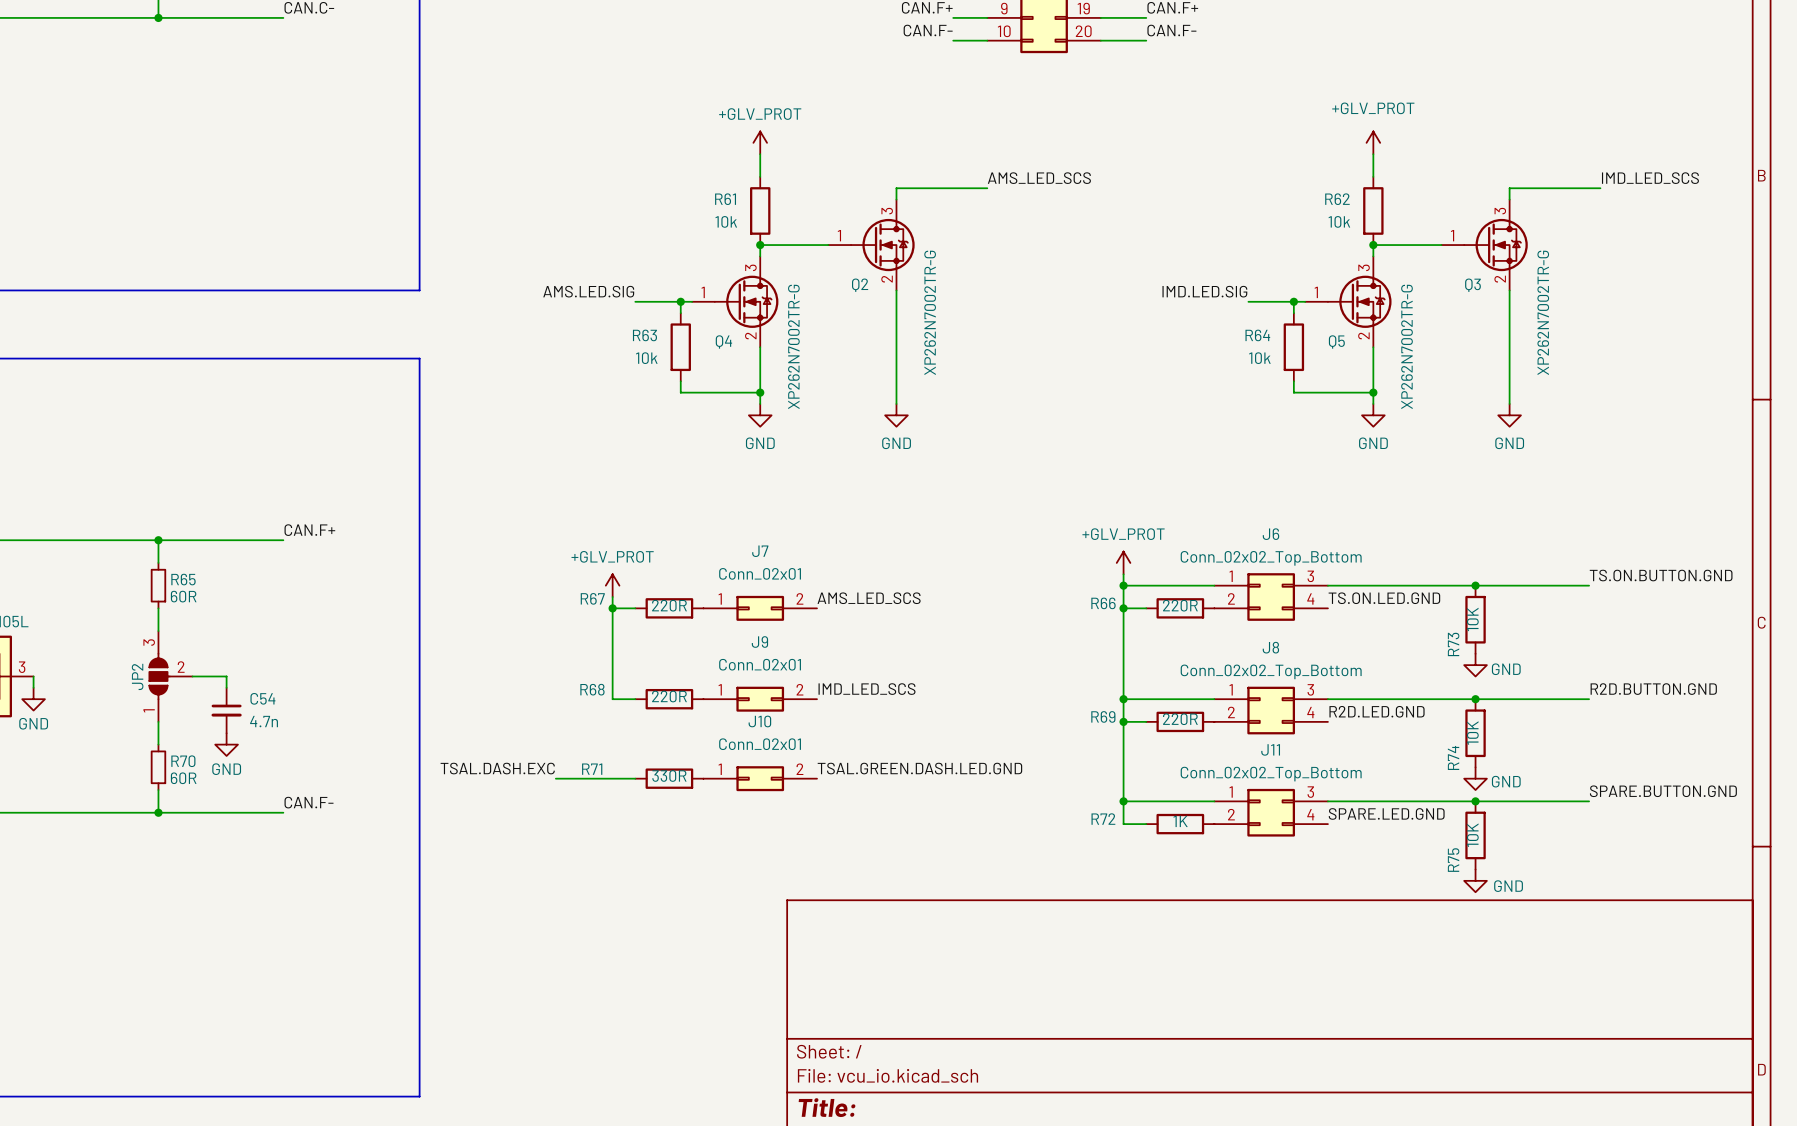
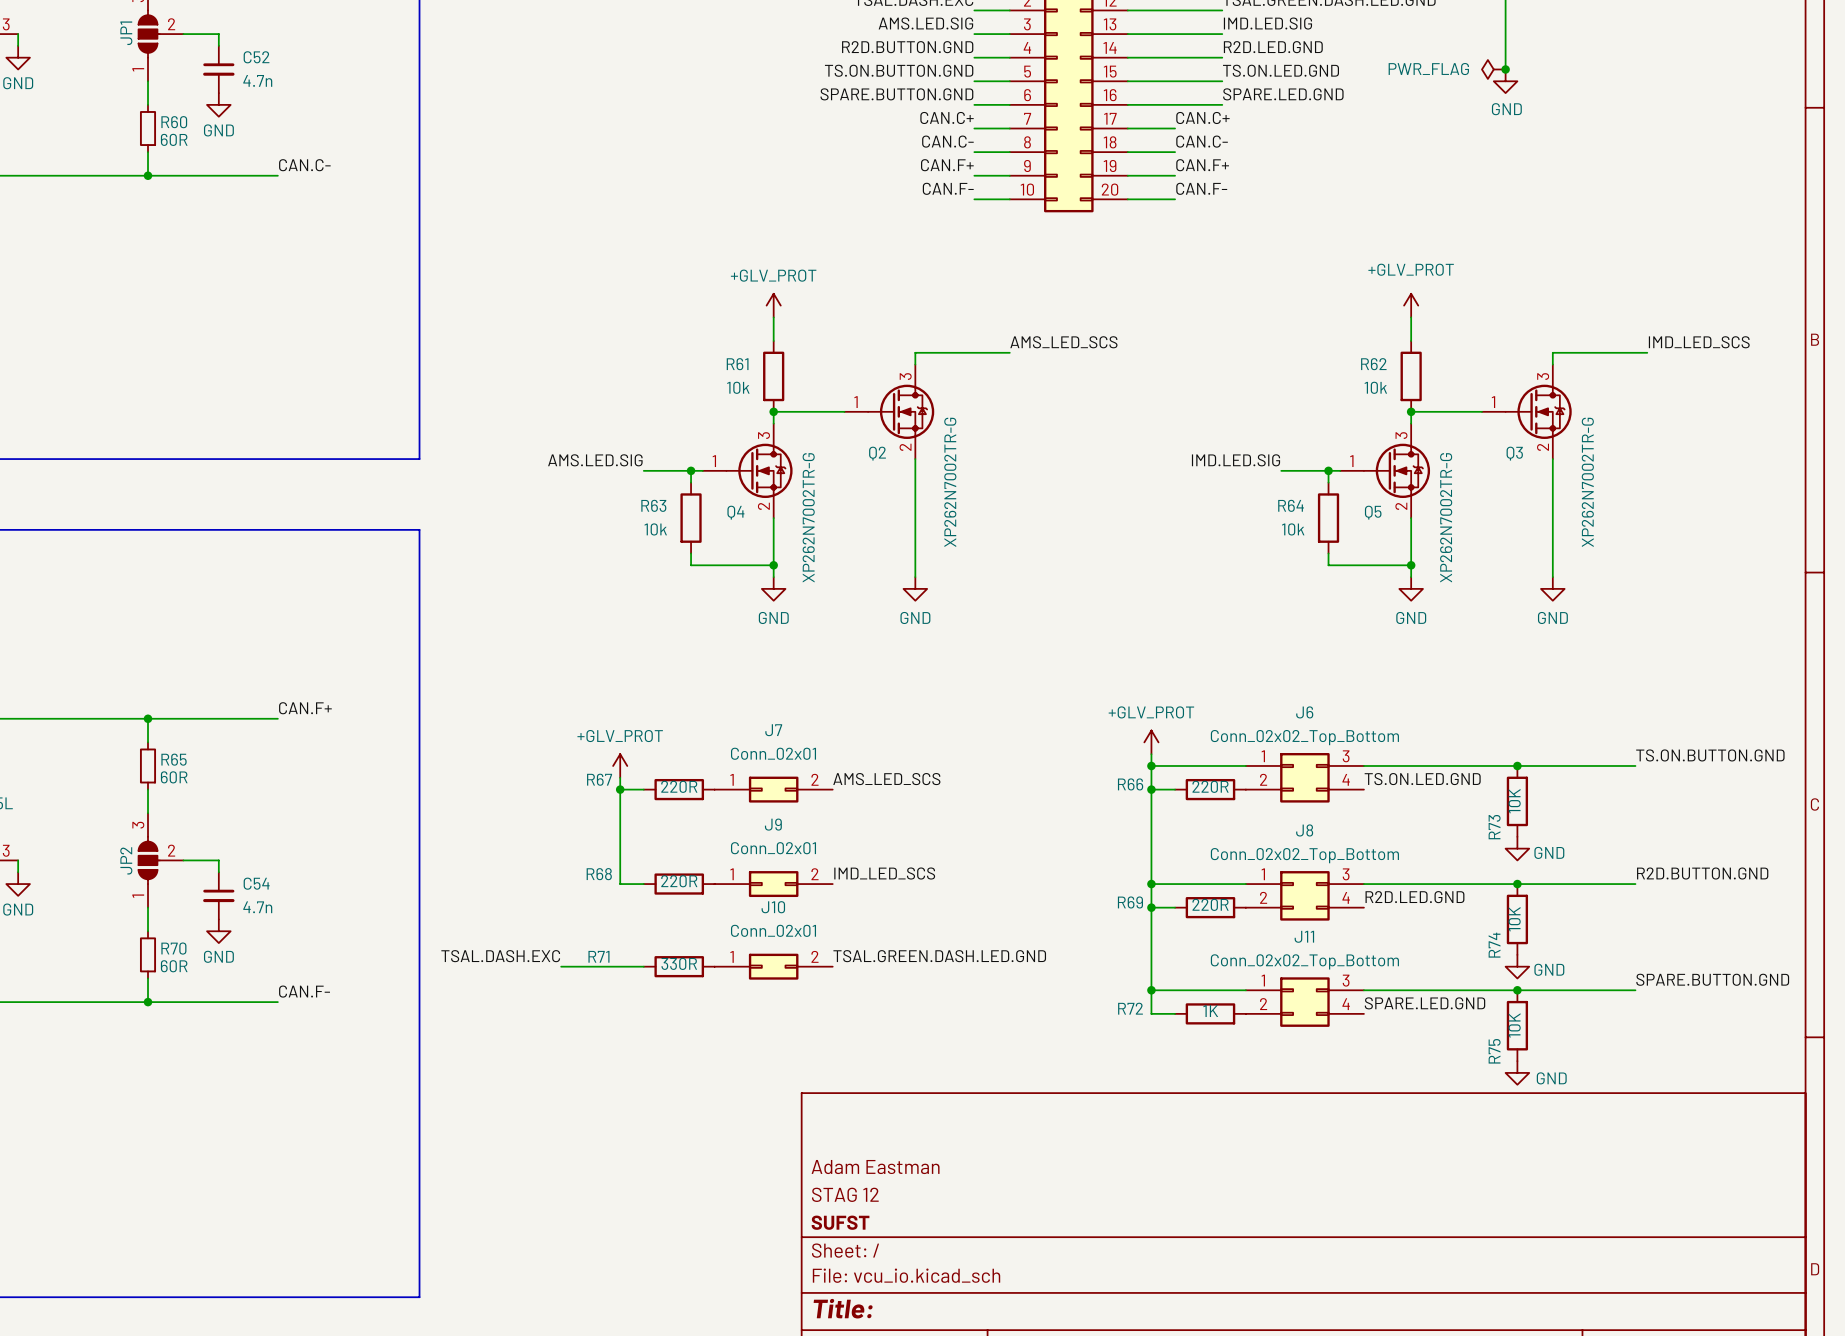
title block: none -> Adam Eastman (875, 1167)
title block: none -> STAG 12 (845, 1194)
title block: none -> SUFST (840, 1222)

